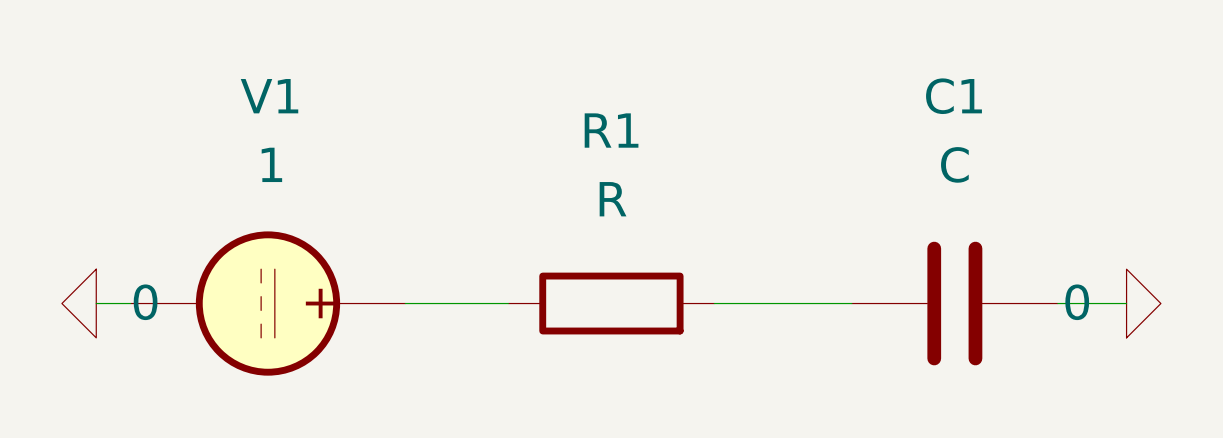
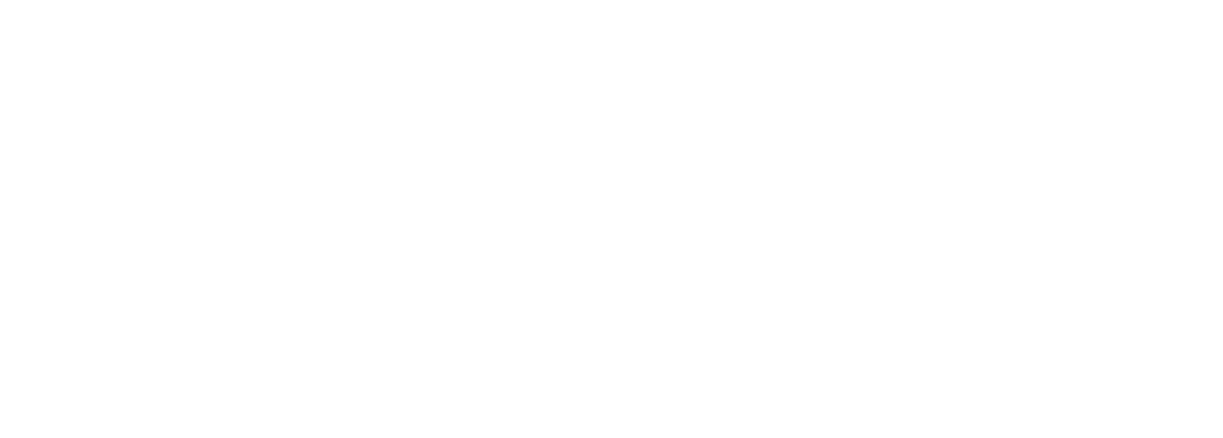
power symbol: 0 (79, 303) -> none
wire: (96, 303) (130, 303) -> none
V1: 1 (267, 303) -> none
wire: (405, 303) (508, 303) -> none
R1: R (611, 303) -> none
wire: (714, 303) (851, 303) -> none
C1: C (954, 303) -> none
wire: (1057, 303) (1126, 303) -> none
power symbol: 0 (1143, 303) -> none

